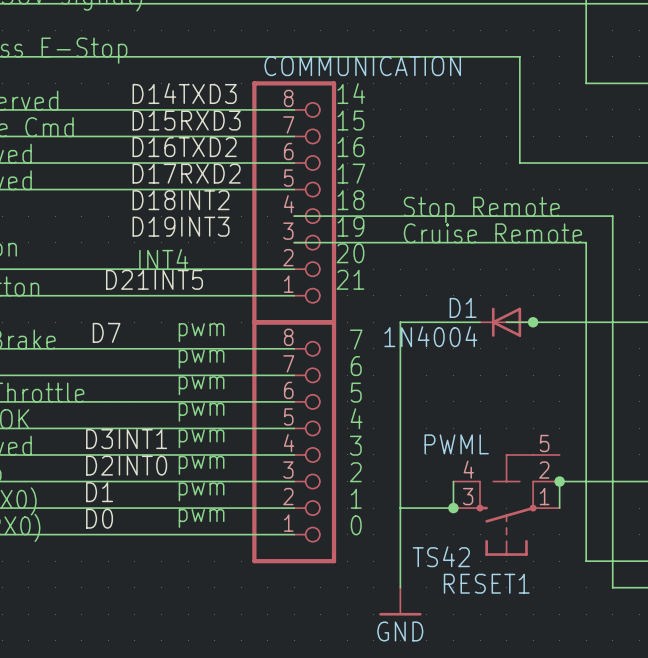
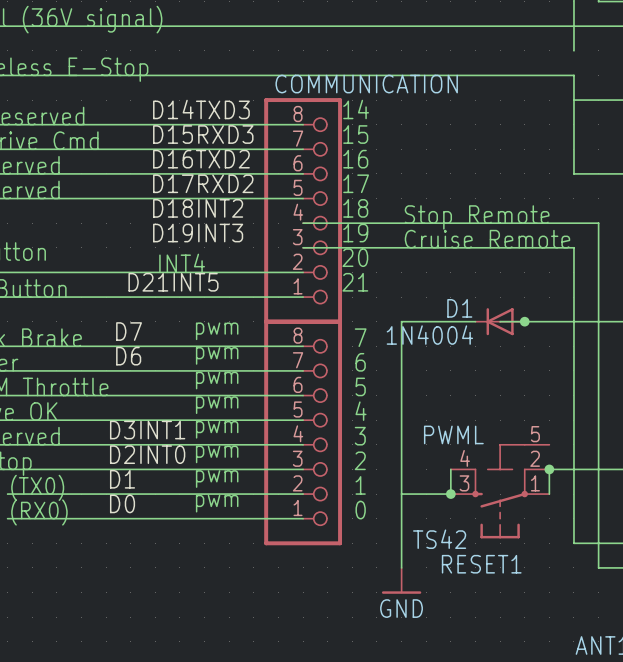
wire: (586, 30) (586, 56) -> (512, 75) (573, 75)
wire: (519, 56) (519, 163) (586, 163) -> (573, 100) (573, 173)
label: none -> D6 (128, 356)

